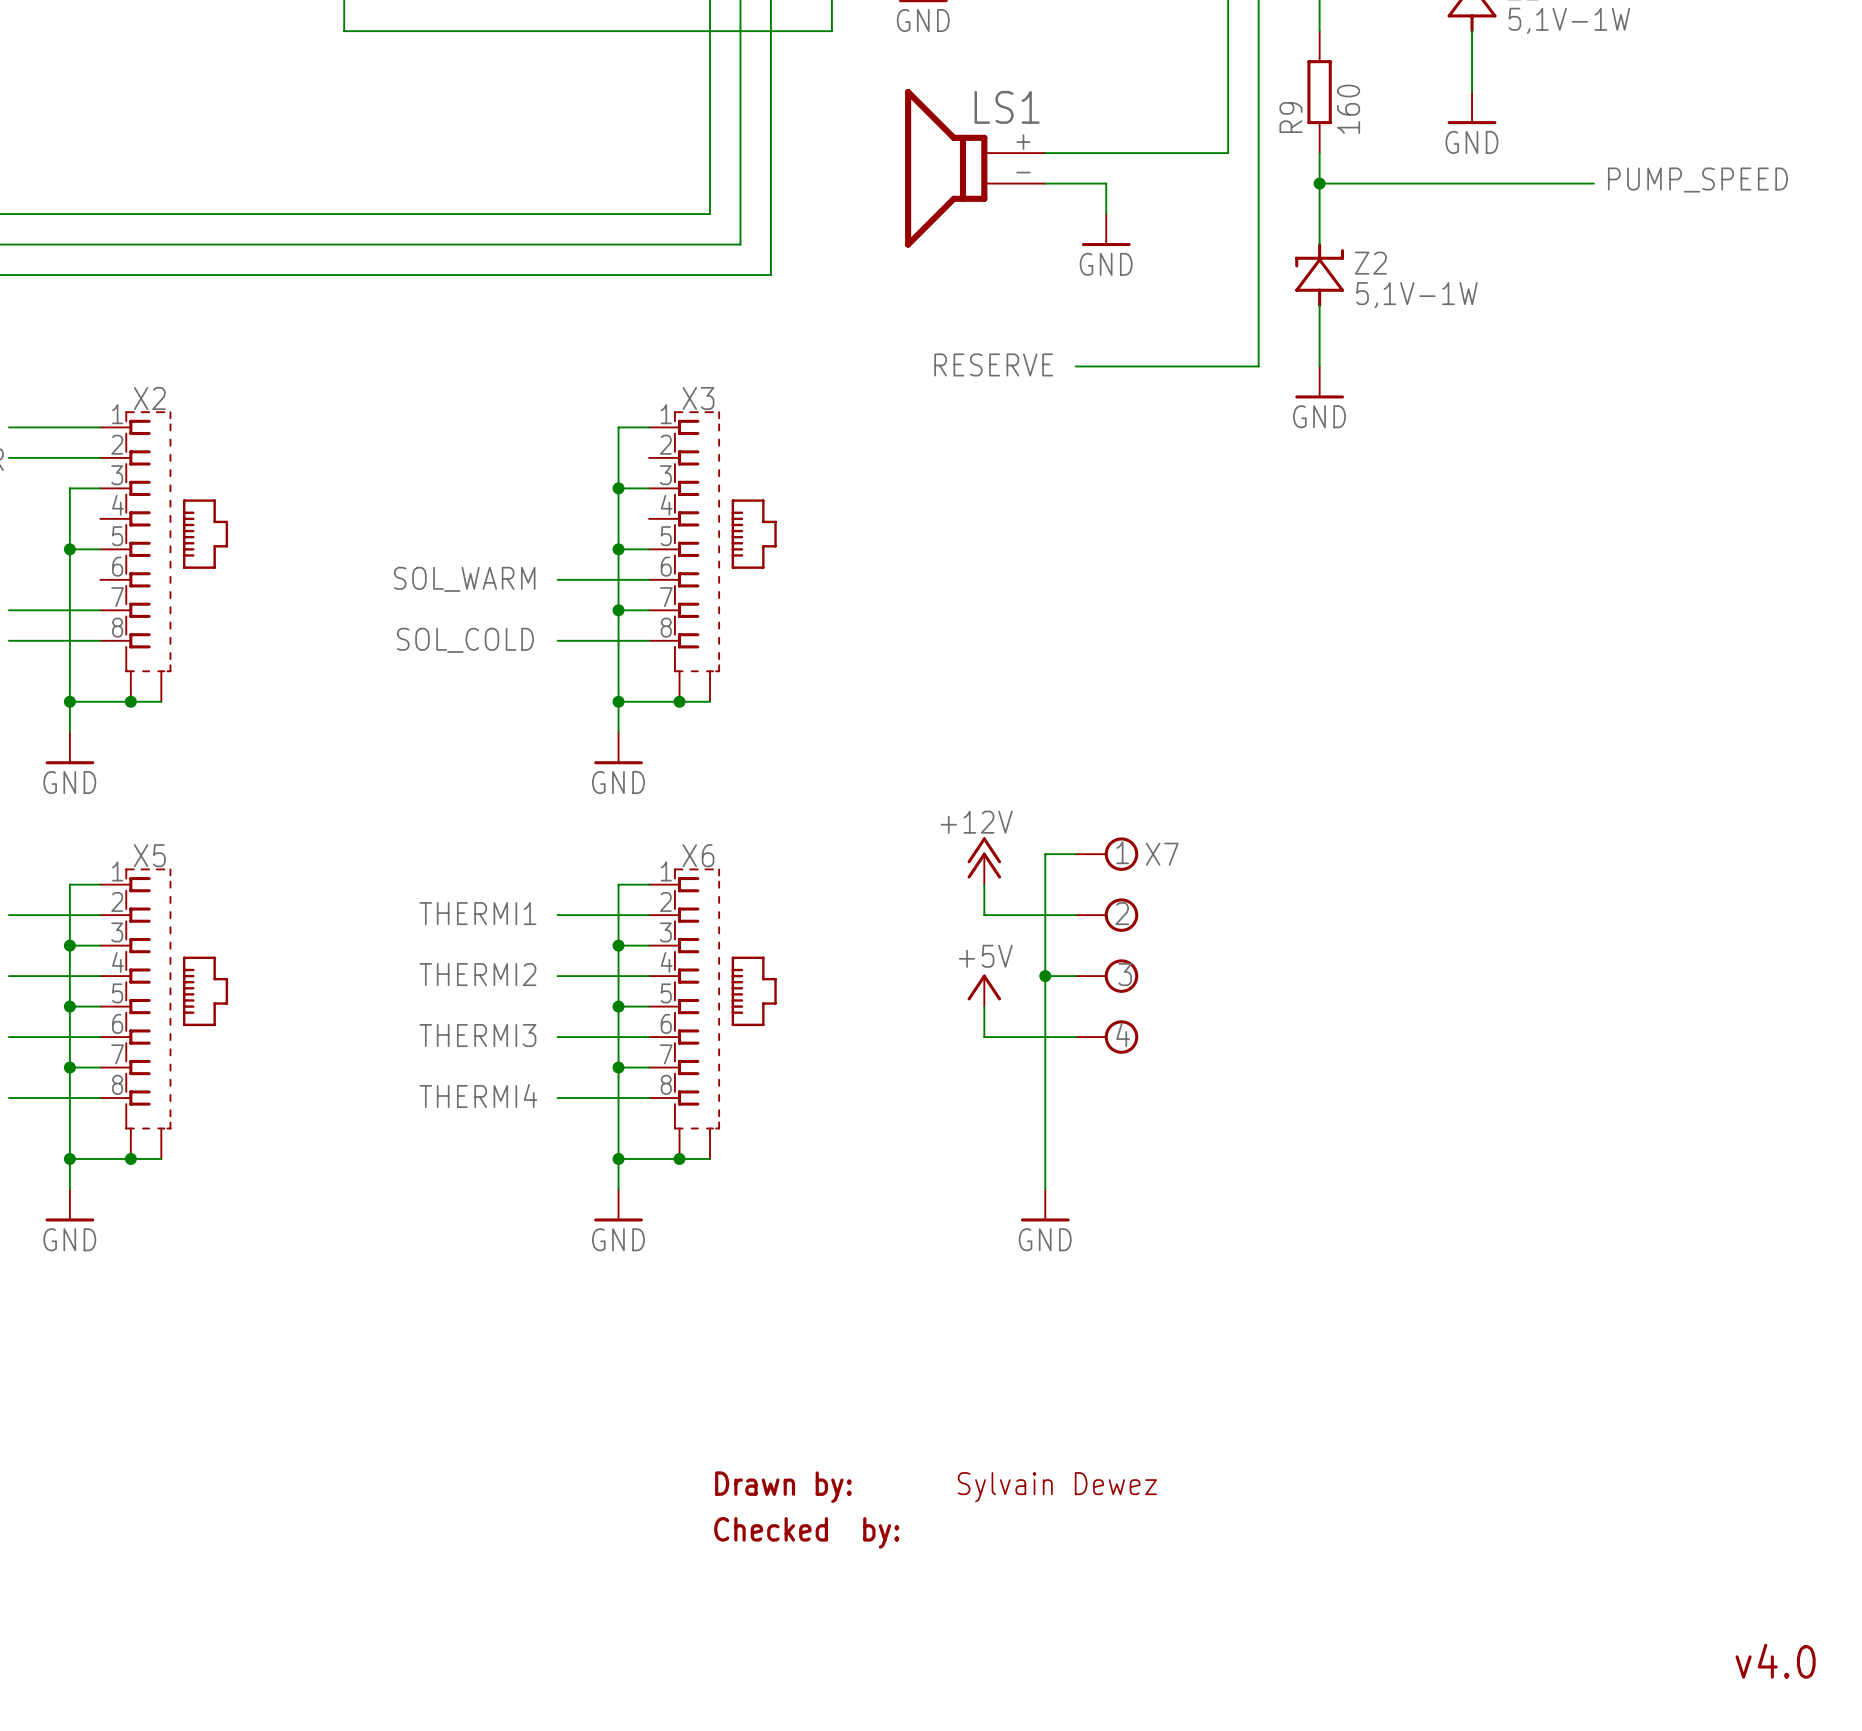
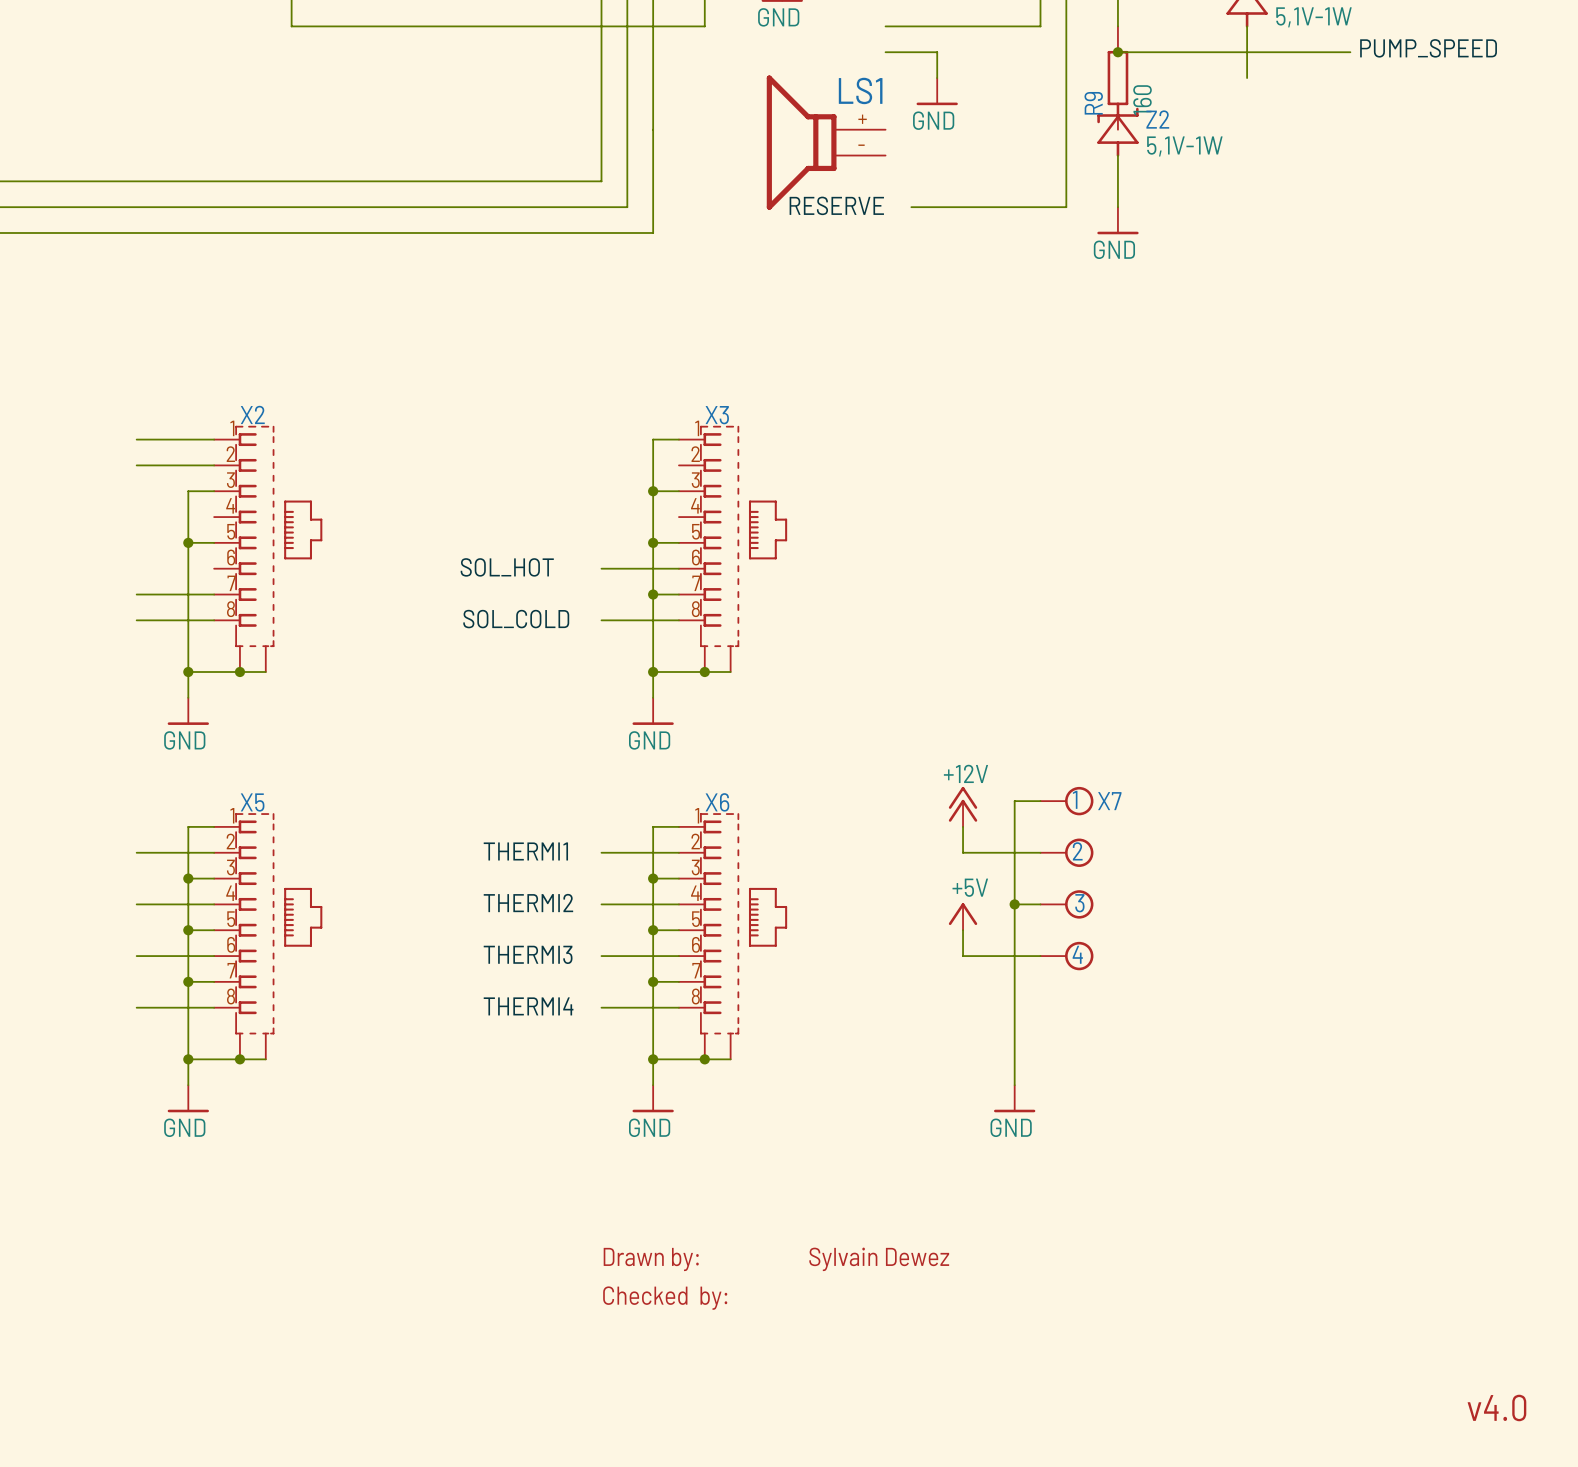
wire: (1228, 31) (1228, 153) (1045, 153) -> (1040, 26) (885, 26)
wire: none -> (1117, 52) (1350, 52)
junction: none -> (1117, 52)
power symbol: none -> GND (937, 91)
power symbol: GND (1472, 108) -> none
wire: (1319, 153) (1319, 183) (1593, 183) -> none
label position: PUMP_SPEED (1697, 180) -> PUMP_SPEED (1428, 48)
wire: (1045, 183) (1106, 183) (1106, 214) -> (885, 52) (937, 52) (937, 78)
junction: (1319, 183) -> none
power symbol: GND (1106, 230) -> none
wire: (1258, 244) (1258, 366) (1075, 366) -> (1066, 207) (911, 207)
power symbol: none -> GND (1117, 220)
Z2 position: (1319, 275) -> (1117, 129)
wire: (1319, 305) (1319, 366) -> none
label position: RESERVE (993, 364) -> RESERVE (836, 205)
power symbol: GND (1319, 382) -> none
wire: (8, 427) (100, 427) -> (136, 439) (214, 439)
wire: (649, 427) (618, 427) (618, 732) -> (678, 439) (653, 439) (653, 697)
wire: (8, 457) (100, 457) -> (136, 465) (214, 465)
wire: (100, 488) (69, 488) (69, 732) -> (214, 491) (188, 491) (188, 697)
wire: (618, 488) (649, 488) -> (653, 491) (678, 491)
junction: (618, 488) -> none
wire: (69, 549) (100, 549) -> (188, 542) (214, 542)
junction: (69, 549) -> none
wire: (618, 549) (649, 549) -> (653, 542) (678, 542)
junction: (618, 549) -> none
X2 position: (164, 556) -> (268, 549)
X3 position: (712, 556) -> (733, 549)
label: SOL_WARM (464, 579) -> none
wire: (557, 579) (649, 579) -> (601, 568) (678, 568)
junction: none -> (653, 491)
wire: (8, 610) (100, 610) -> (188, 671) (265, 671)
wire: (618, 610) (649, 610) -> (653, 594) (678, 594)
junction: (618, 610) -> none
wire: (8, 640) (100, 640) -> (136, 620) (214, 620)
junction: none -> (188, 542)
label position: SOL_COLD (465, 640) -> SOL_COLD (516, 619)
wire: (557, 640) (649, 640) -> (601, 620) (678, 620)
junction: none -> (653, 542)
label: none -> SOL_HOT (507, 567)
wire: (69, 701) (161, 701) -> (214, 594) (136, 594)
junction: (69, 701) -> none
junction: (130, 701) -> none
wire: (618, 701) (709, 701) -> (653, 671) (730, 671)
junction: (618, 701) -> none
junction: (679, 701) -> none
junction: none -> (653, 594)
power symbol position: GND (69, 748) -> GND (188, 711)
power symbol position: GND (618, 748) -> GND (653, 711)
junction: none -> (188, 671)
junction: none -> (239, 671)
junction: none -> (653, 671)
junction: none -> (704, 671)
wire: (1075, 854) (1045, 854) (1045, 1189) -> (1040, 801) (1014, 801) (1014, 1085)
power symbol position: +12V (984, 861) -> +12V (963, 806)
wire: (100, 884) (69, 884) (69, 1189) -> (214, 826) (188, 826) (188, 1085)
wire: (649, 884) (618, 884) (618, 1189) -> (678, 826) (653, 826) (653, 1085)
wire: (984, 884) (984, 915) (1075, 915) -> (963, 826) (963, 852) (1040, 852)
label position: THERMI1 (477, 913) -> THERMI1 (525, 851)
wire: (8, 915) (100, 915) -> (136, 852) (214, 852)
wire: (557, 915) (649, 915) -> (601, 852) (678, 852)
wire: (69, 945) (100, 945) -> (188, 878) (214, 878)
junction: (69, 945) -> none
wire: (618, 945) (649, 945) -> (653, 878) (678, 878)
junction: (618, 945) -> none
X7 position: (1107, 945) -> (1066, 878)
label position: THERMI2 (477, 974) -> THERMI2 (528, 903)
wire: (8, 976) (100, 976) -> (136, 904) (214, 904)
wire: (557, 976) (649, 976) -> (601, 904) (678, 904)
wire: (1045, 976) (1075, 976) -> (1014, 904) (1040, 904)
junction: (1045, 976) -> none
power symbol position: +5V (984, 990) -> +5V (963, 916)
wire: (69, 1006) (100, 1006) -> (188, 930) (214, 930)
junction: (69, 1006) -> none
wire: (618, 1006) (649, 1006) -> (653, 930) (678, 930)
junction: (618, 1006) -> none
wire: (984, 1006) (984, 1037) (1075, 1037) -> (963, 930) (963, 956) (1040, 956)
X5 position: (164, 1013) -> (268, 936)
X6 position: (712, 1013) -> (733, 936)
label position: THERMI3 (477, 1035) -> THERMI3 (528, 954)
wire: (8, 1037) (100, 1037) -> (136, 956) (214, 956)
junction: none -> (188, 878)
wire: (557, 1037) (649, 1037) -> (601, 956) (678, 956)
junction: none -> (653, 878)
wire: (69, 1067) (100, 1067) -> (188, 981) (214, 981)
junction: (69, 1067) -> none
wire: (618, 1067) (649, 1067) -> (653, 981) (678, 981)
junction: (618, 1067) -> none
junction: none -> (1014, 904)
label position: THERMI4 (478, 1095) -> THERMI4 (528, 1006)
wire: (8, 1098) (100, 1098) -> (136, 1007) (214, 1007)
junction: none -> (188, 930)
wire: (557, 1098) (649, 1098) -> (601, 1007) (678, 1007)
junction: none -> (653, 930)
wire: (69, 1158) (161, 1158) -> (188, 1059) (265, 1059)
junction: (69, 1158) -> none
junction: (130, 1158) -> none
junction: none -> (188, 981)
wire: (618, 1158) (709, 1158) -> (653, 1059) (730, 1059)
junction: (618, 1158) -> none
junction: (679, 1158) -> none
junction: none -> (653, 981)
power symbol position: GND (69, 1205) -> GND (188, 1098)
power symbol: GND (618, 1205) -> none
power symbol: GND (1045, 1205) -> none
junction: none -> (188, 1059)
junction: none -> (239, 1059)
junction: none -> (653, 1059)
junction: none -> (704, 1059)
power symbol: none -> GND (653, 1098)
power symbol: none -> GND (1014, 1098)

